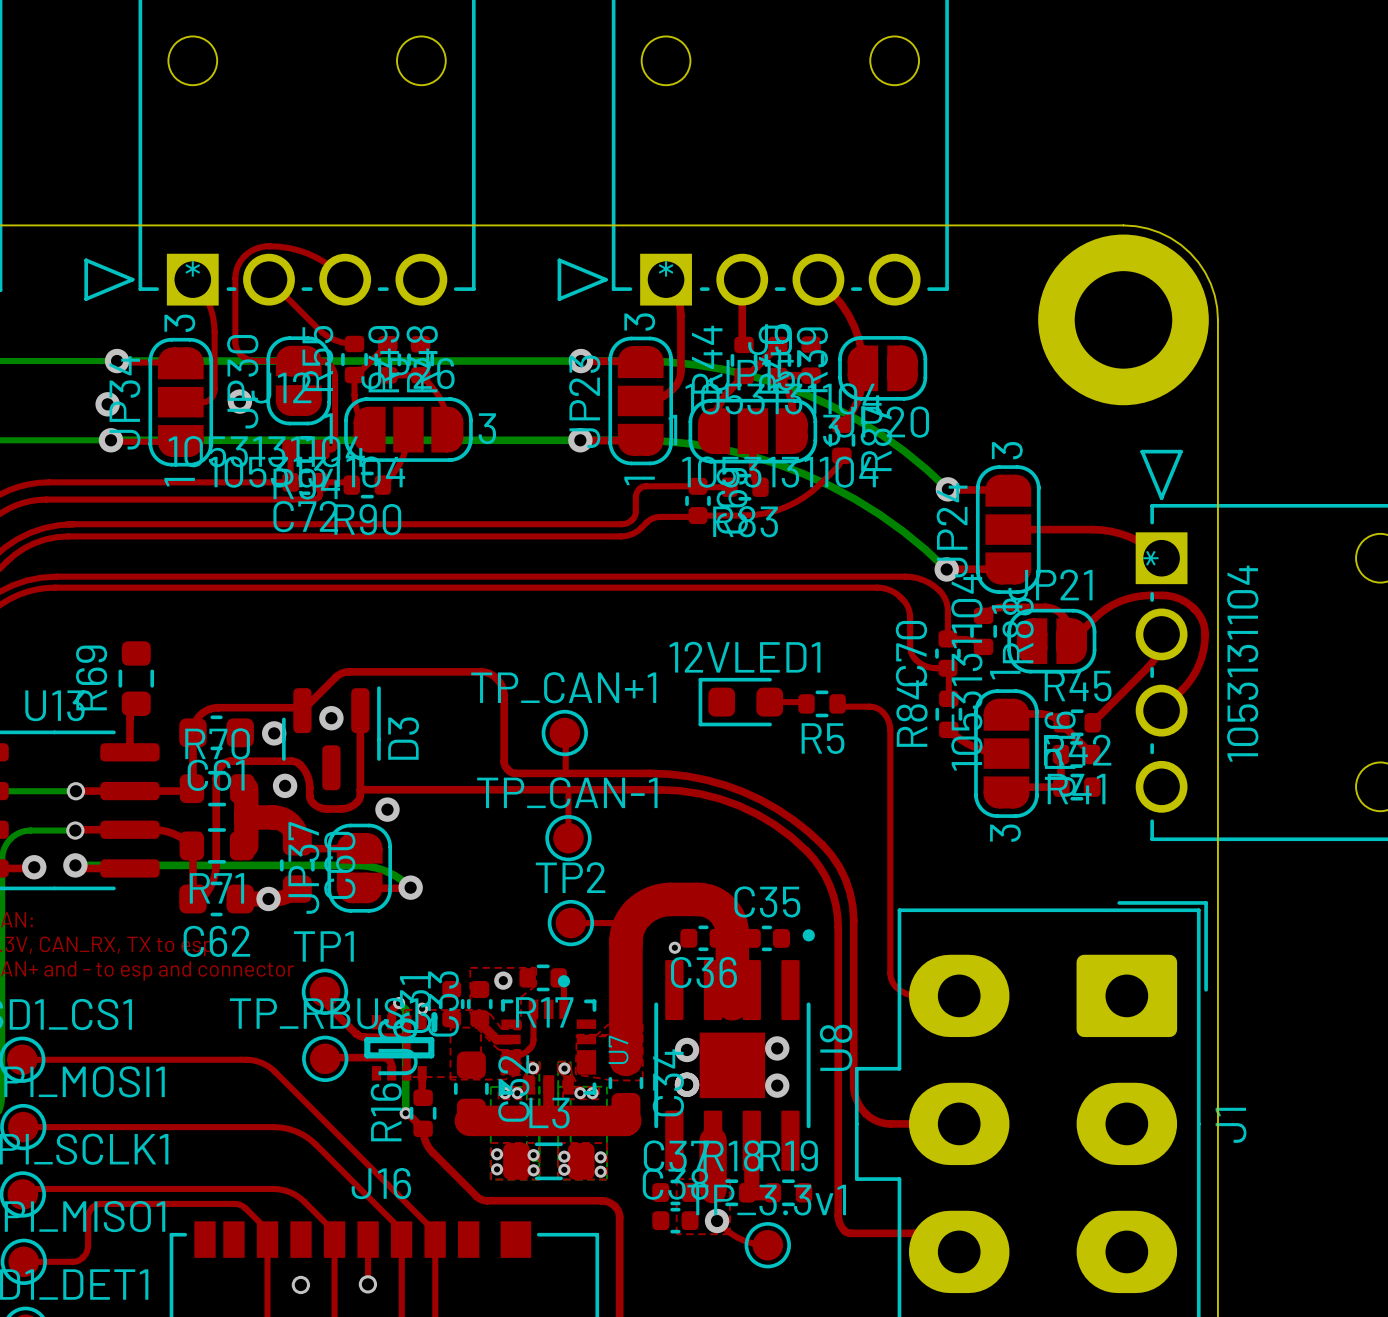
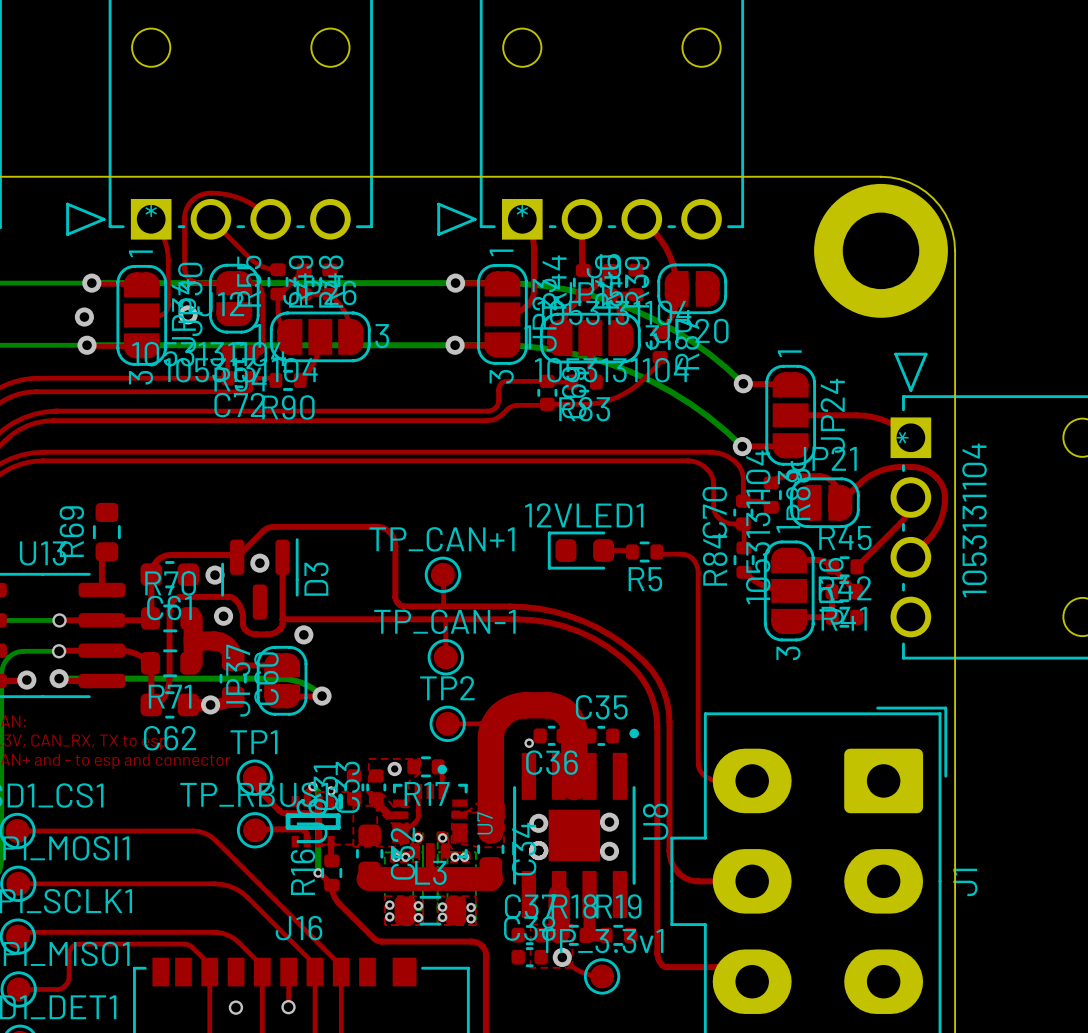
JP23 rotation: 0° (640, 400) -> 180° (502, 314)
JP34 rotation: 0° (180, 402) -> 180° (141, 315)
JP24 rotation: 0° (1008, 529) -> 180° (790, 415)

